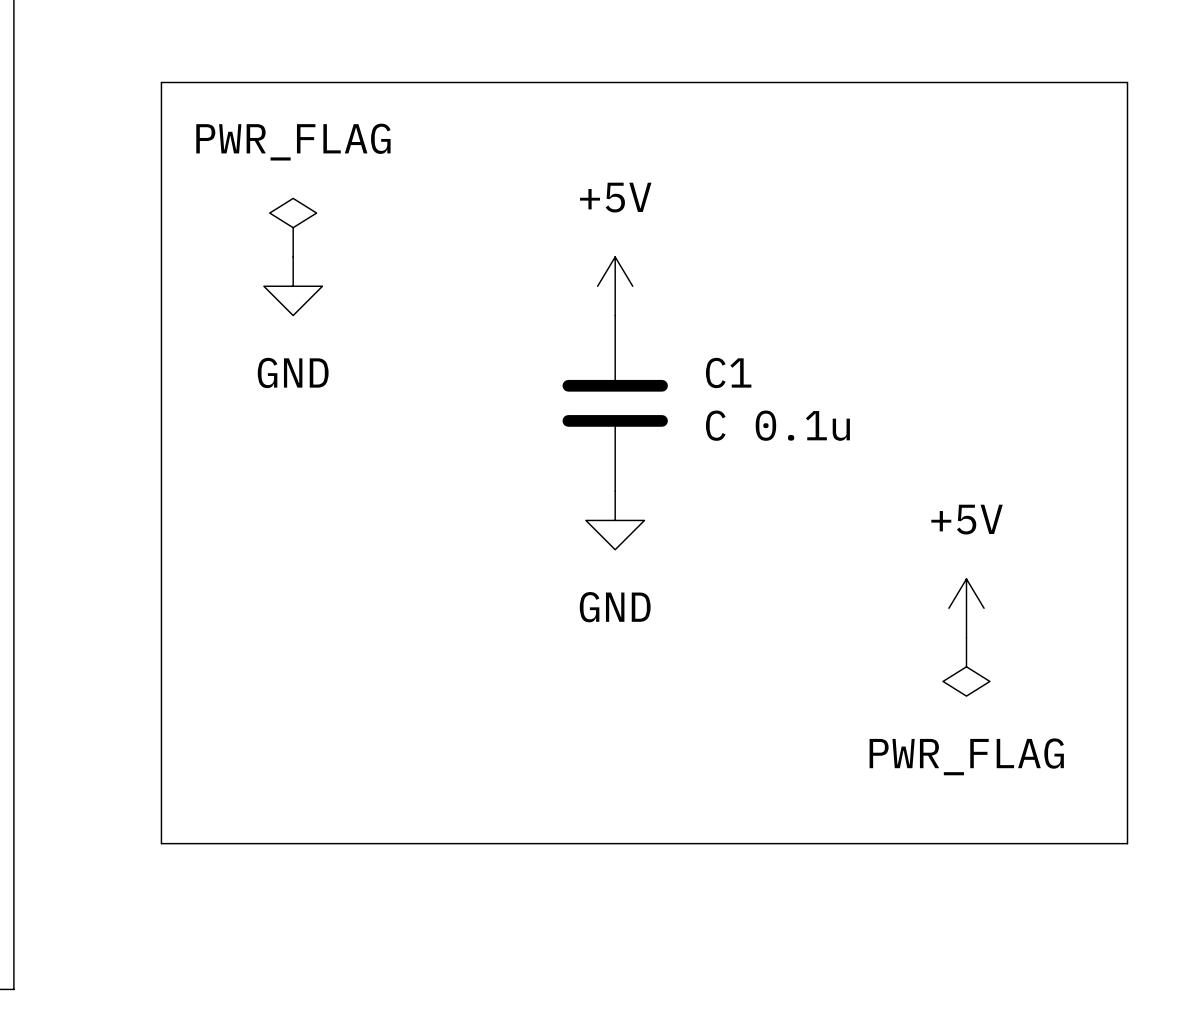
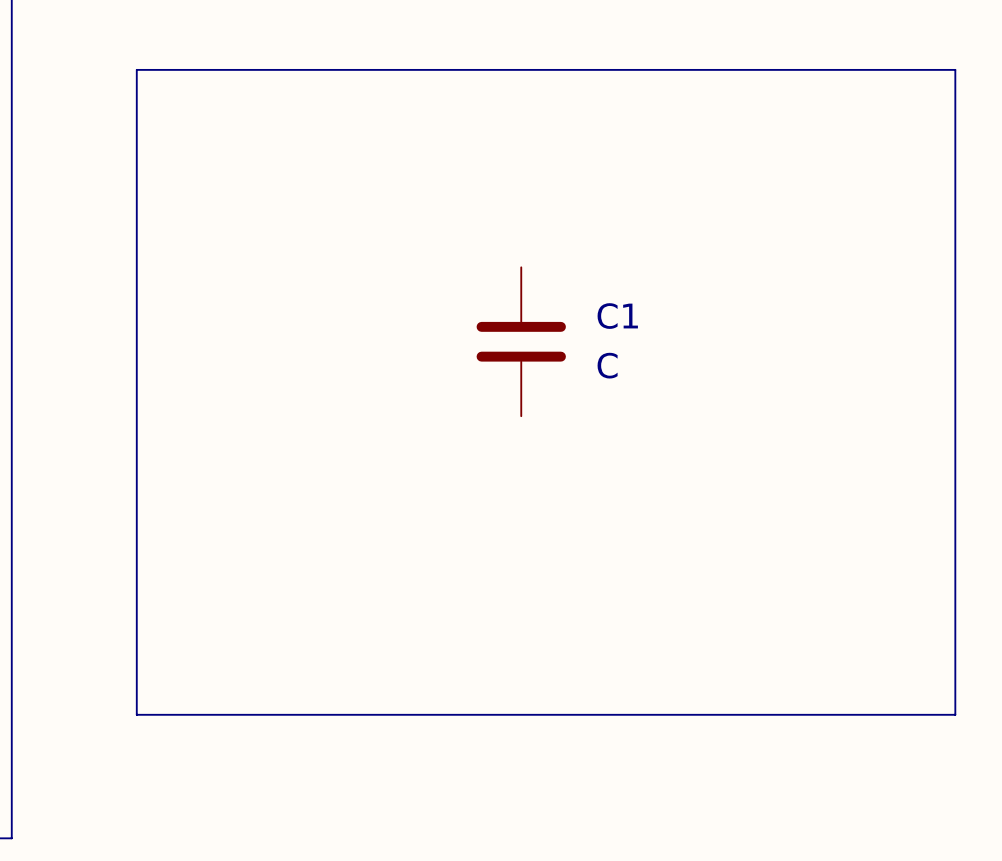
power symbol: PWR_FLAG (293, 227) -> none
power symbol: GND (293, 286) -> none
power symbol: +5V (615, 286) -> none
C1 value: C 0.1u (777, 425) -> C (607, 365)
power symbol: GND (615, 520) -> none
power symbol: +5V (966, 608) -> none
power symbol: PWR_FLAG (966, 666) -> none

